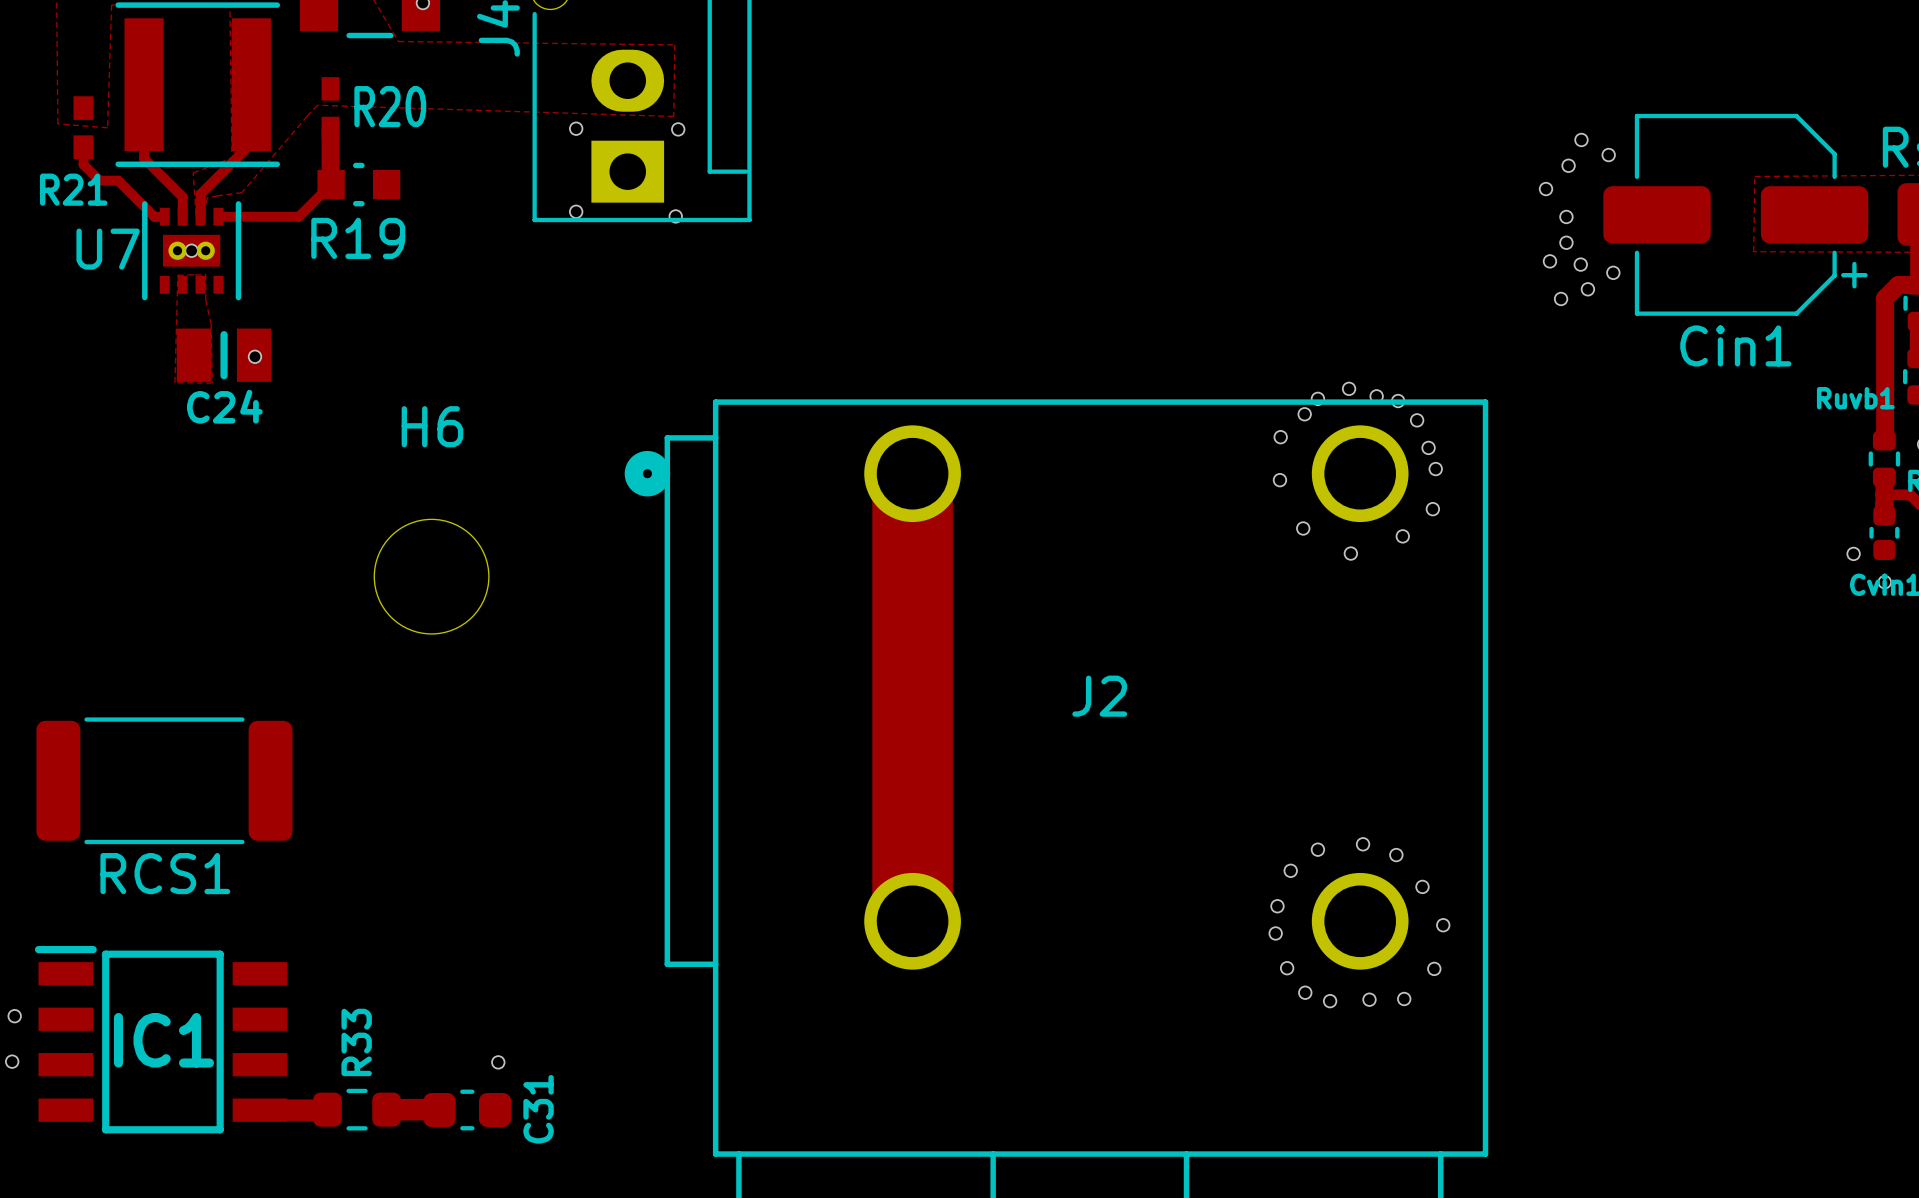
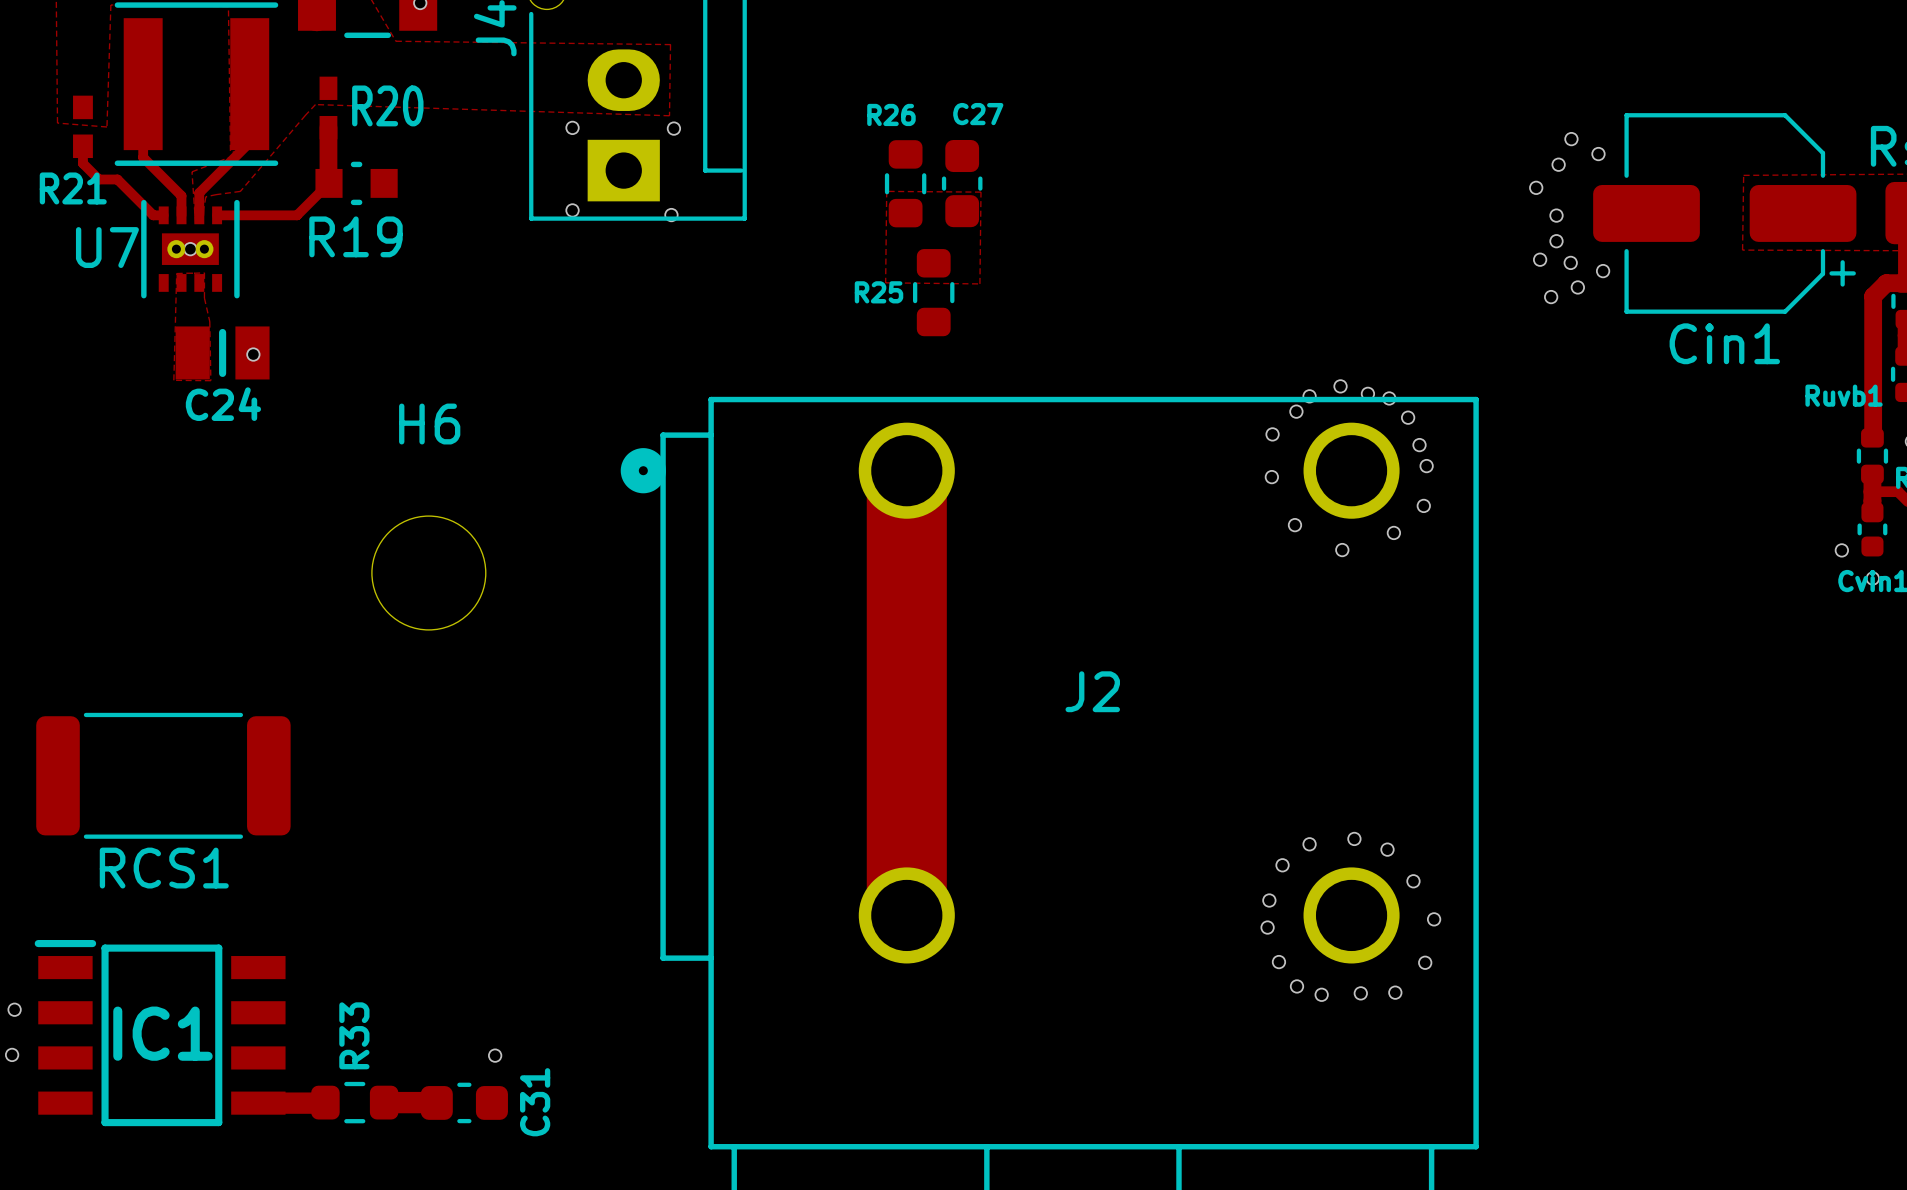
R26: none -> (905, 183)
C27: none -> (962, 183)
top zone outline: none -> (886, 191) (981, 192) (979, 283) (885, 282) (886, 191)
R25: none -> (933, 292)

